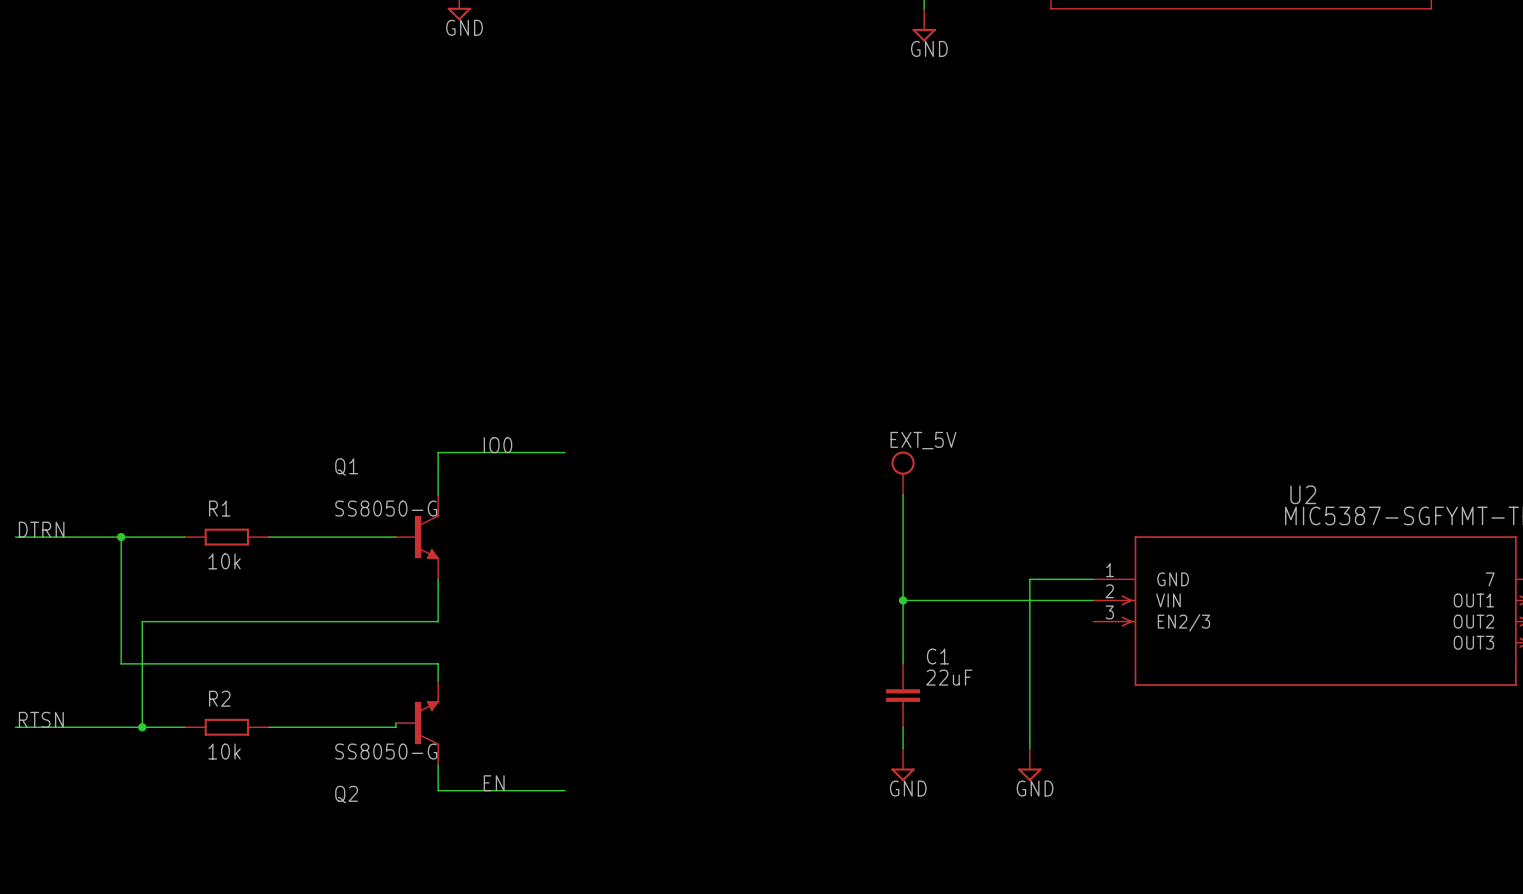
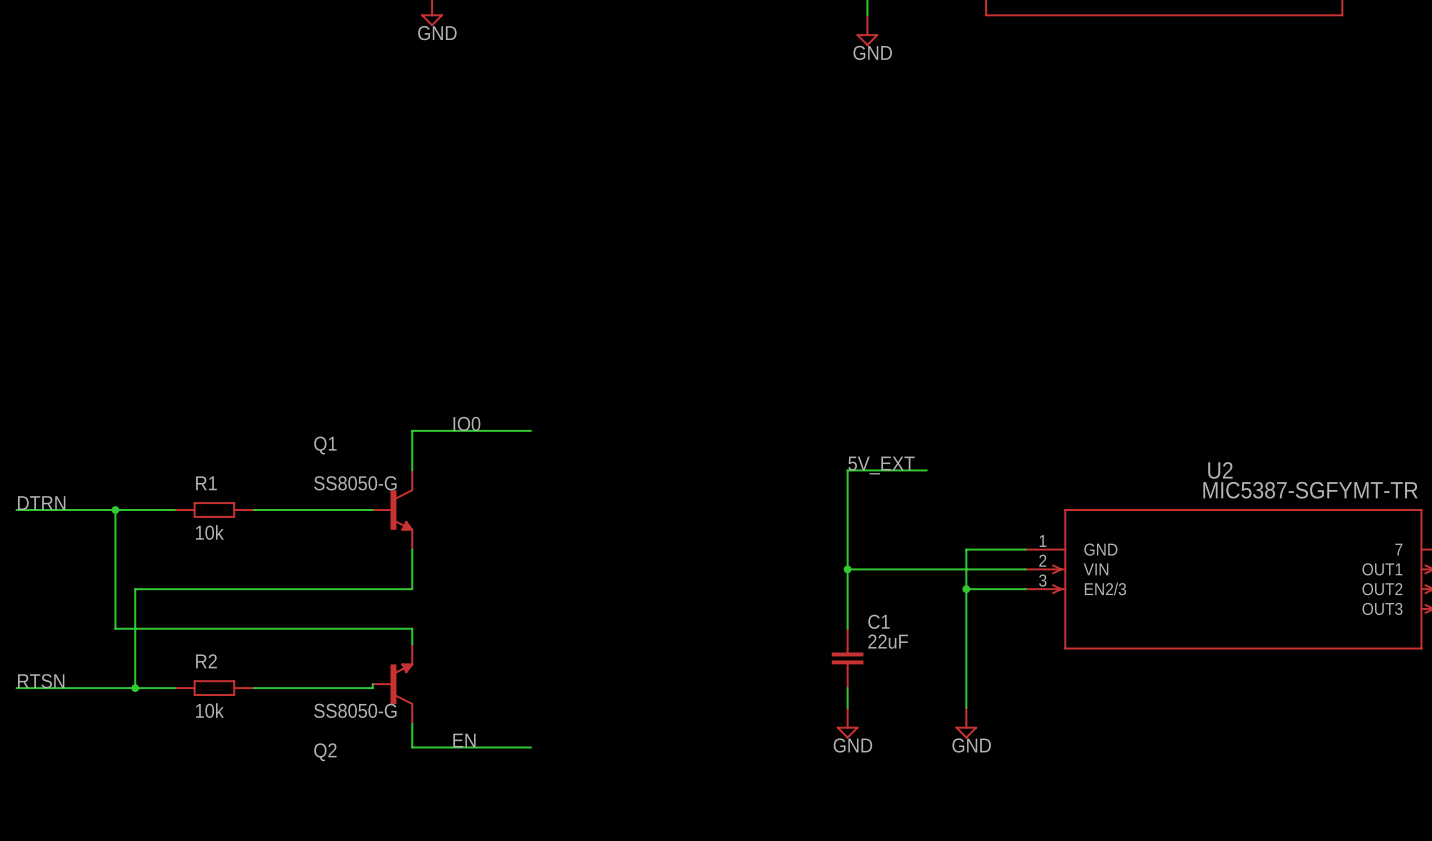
power symbol: EXT_5V (903, 473) -> none
label: none -> 5V_EXT (881, 465)
wire: none -> (847, 470) (926, 470)
wire: none -> (966, 589) (1025, 589)
junction: none -> (966, 589)

